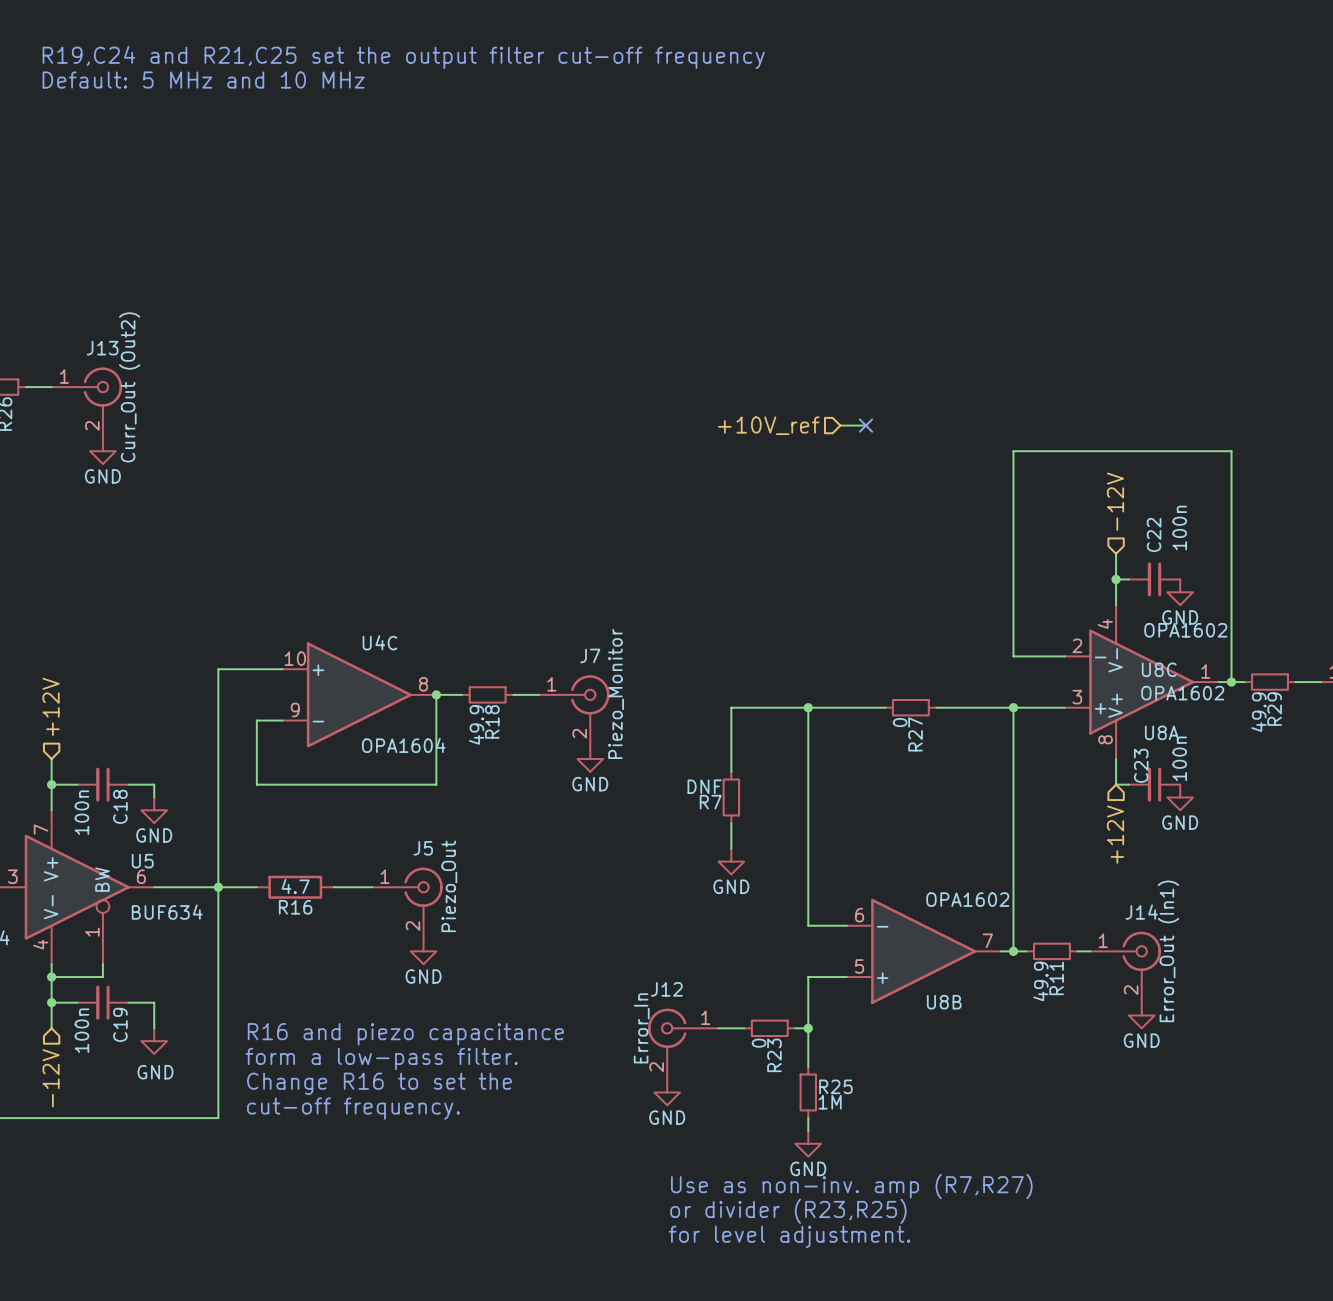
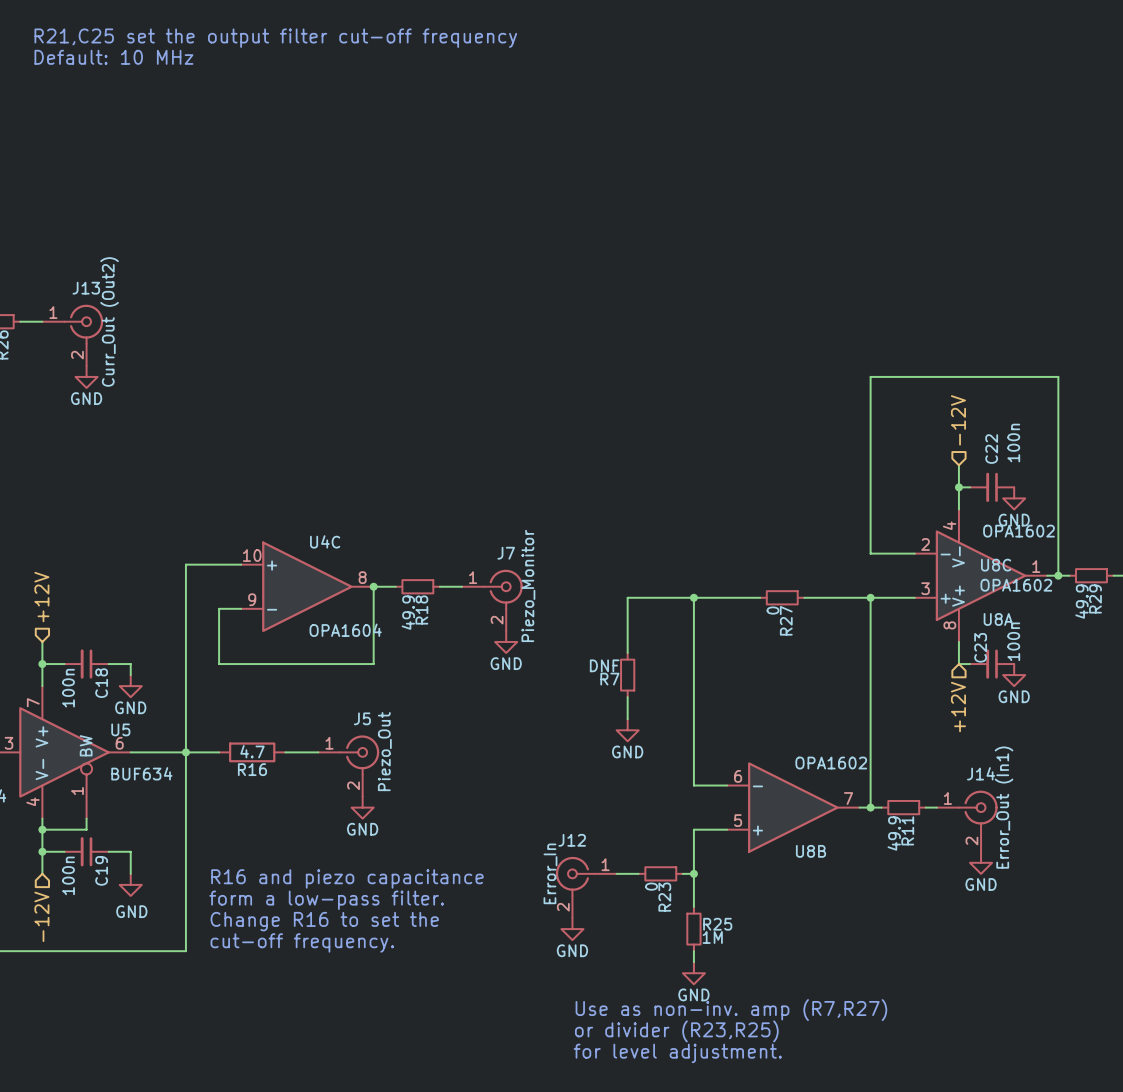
text: R19,C24 and R21,C25 set the output filter cut-off frequency (403, 57) -> R21,C25 set the output filter cut-off frequency (275, 38)
text: Default: 5 MHz and 10 MHz (203, 80) -> Default: 10 MHz (113, 57)
hierarchical label: +10V_ref (768, 425) -> none
wire: (840, 425) (866, 425) -> none
no-connect mark: (866, 425) -> none

